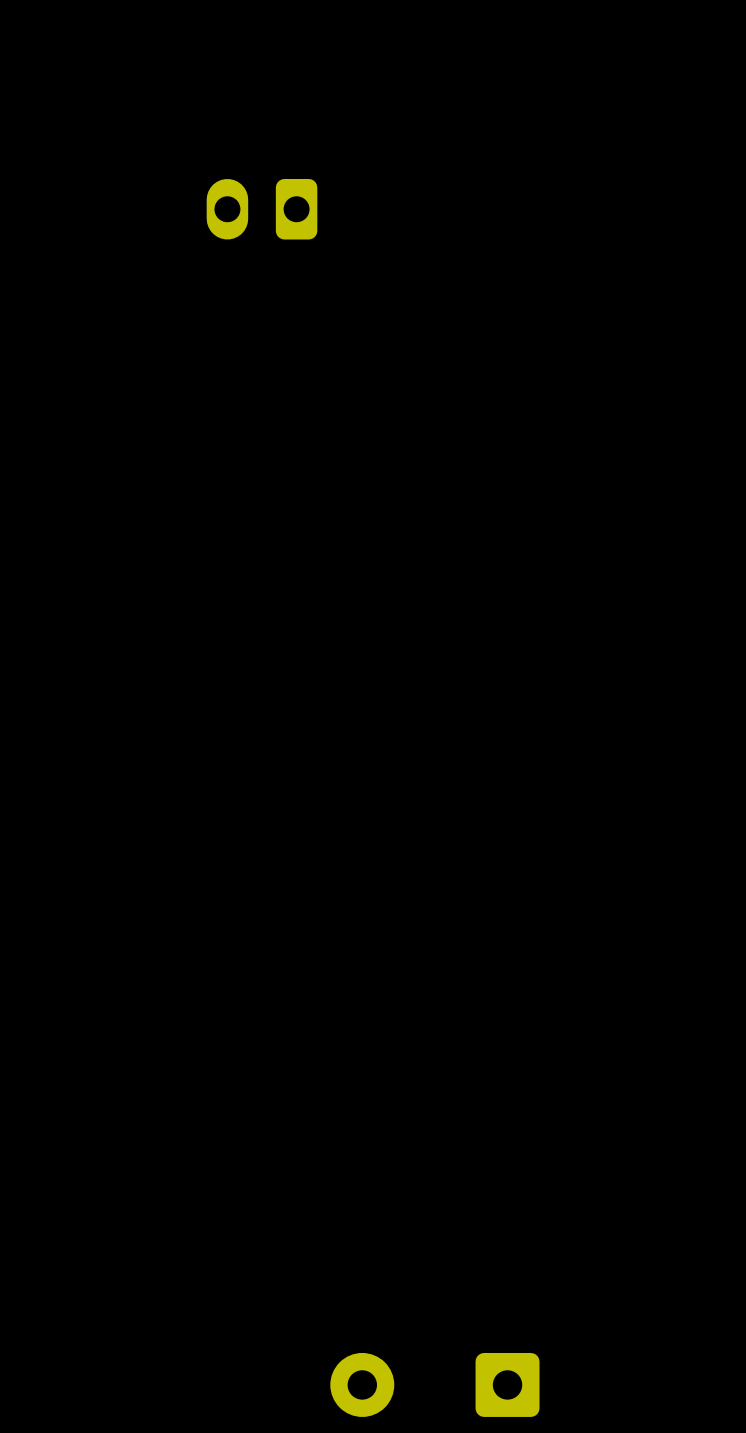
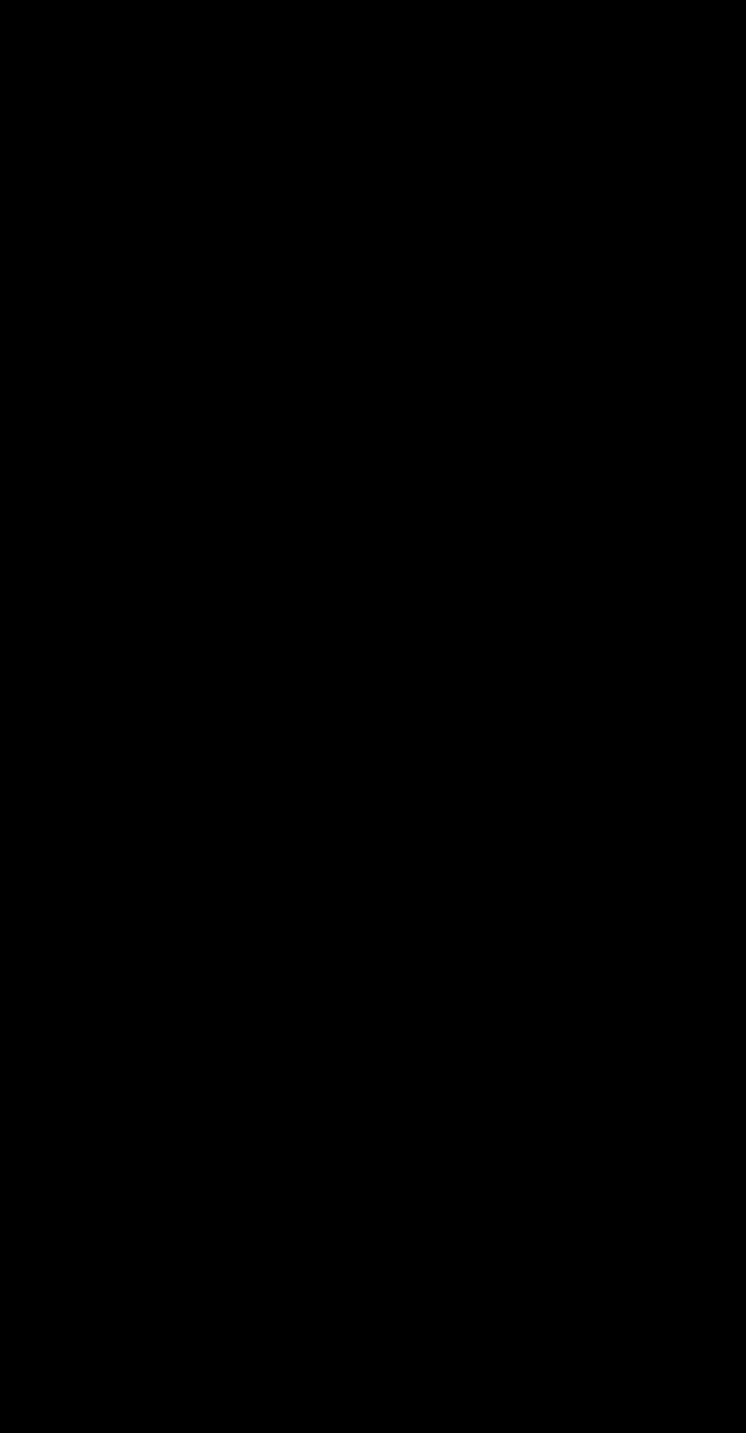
part: (262, 209) -> none
part: (434, 1384) -> none

